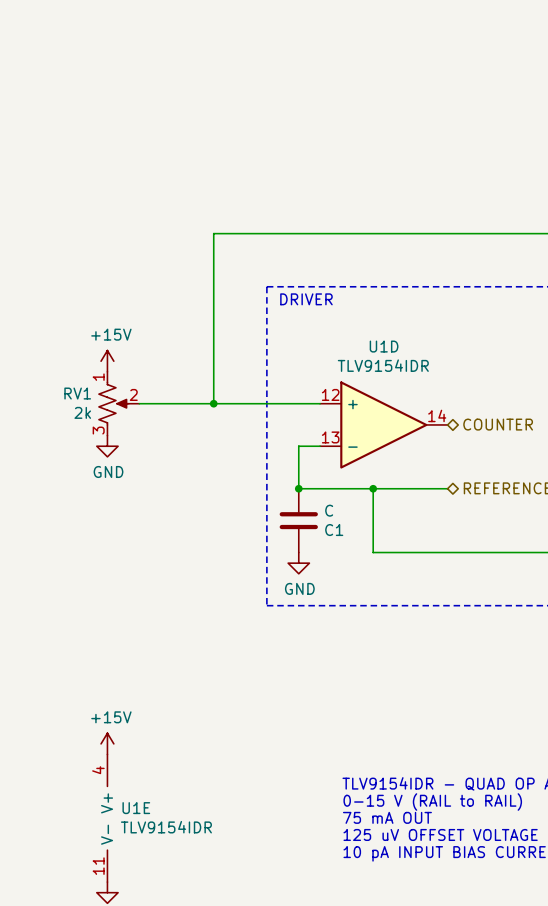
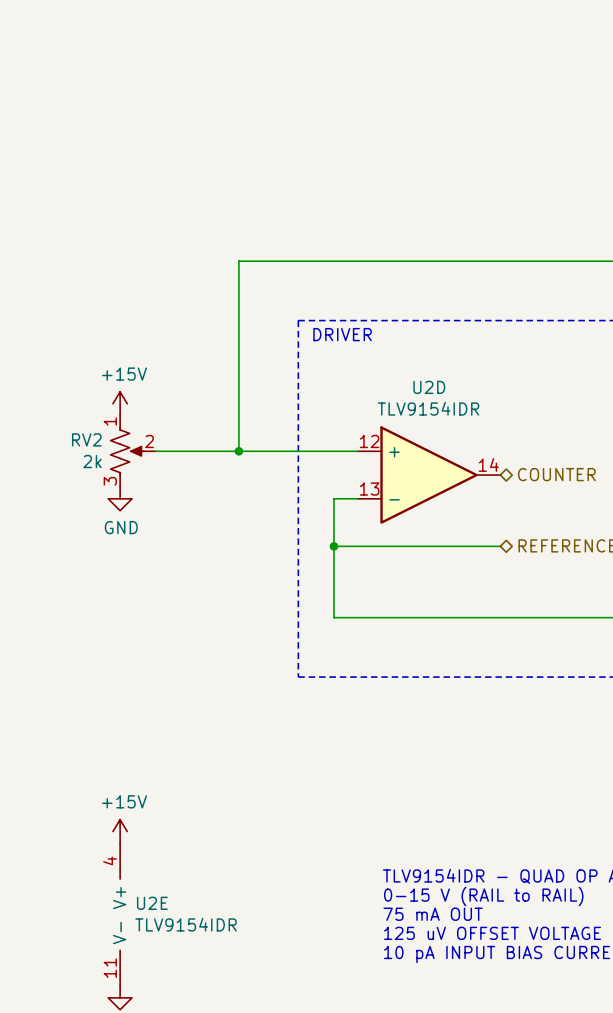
U1D name: U1D (384, 346) -> U2D (429, 387)
RV1 name: RV1 (77, 393) -> RV2 (86, 439)
wire: (373, 488) (373, 552) -> (333, 546) (333, 617) (417, 617)
junction: (373, 488) -> none
C1: C (298, 520) -> none
power symbol: GND (298, 563) -> none
U1E name: U1E (136, 808) -> U2E (152, 903)

